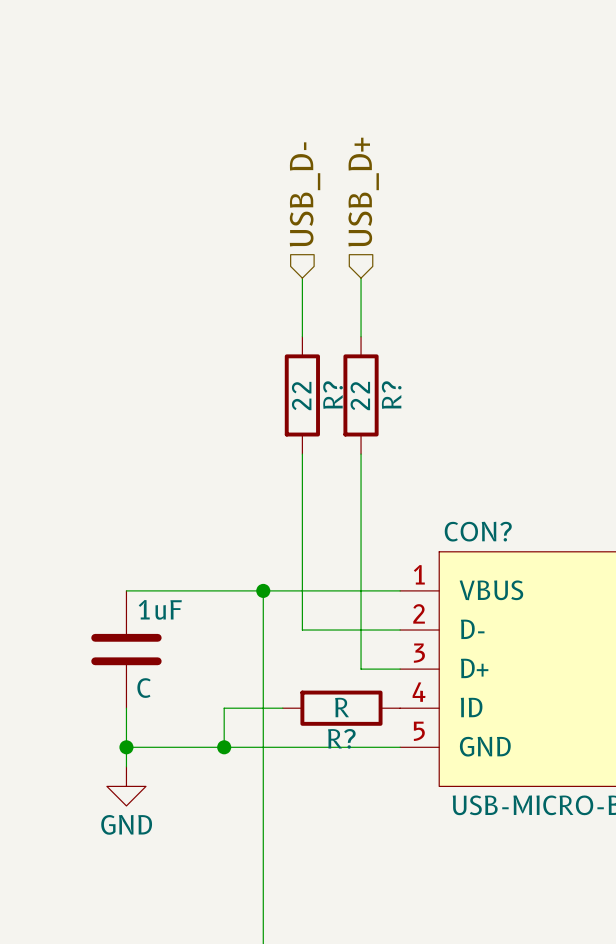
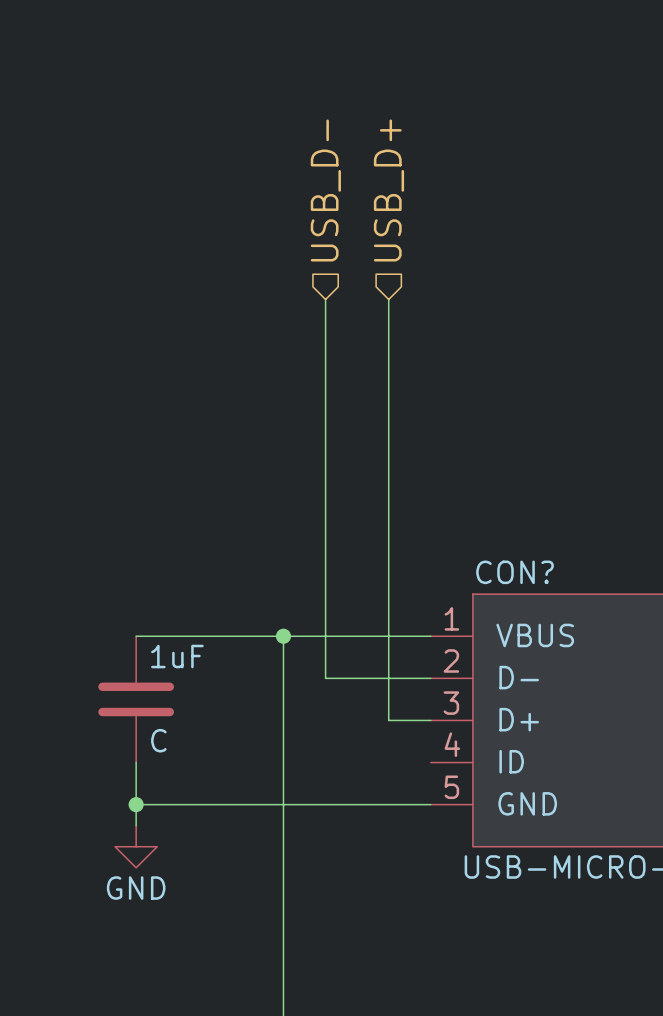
wire: none -> (325, 362) (325, 488)
wire: none -> (388, 362) (388, 488)
R?: 22 (302, 395) -> none
R?: 22 (361, 395) -> none
wire: (282, 708) (224, 708) (224, 747) -> none
R?: R (341, 708) -> none
junction: (224, 747) -> none

